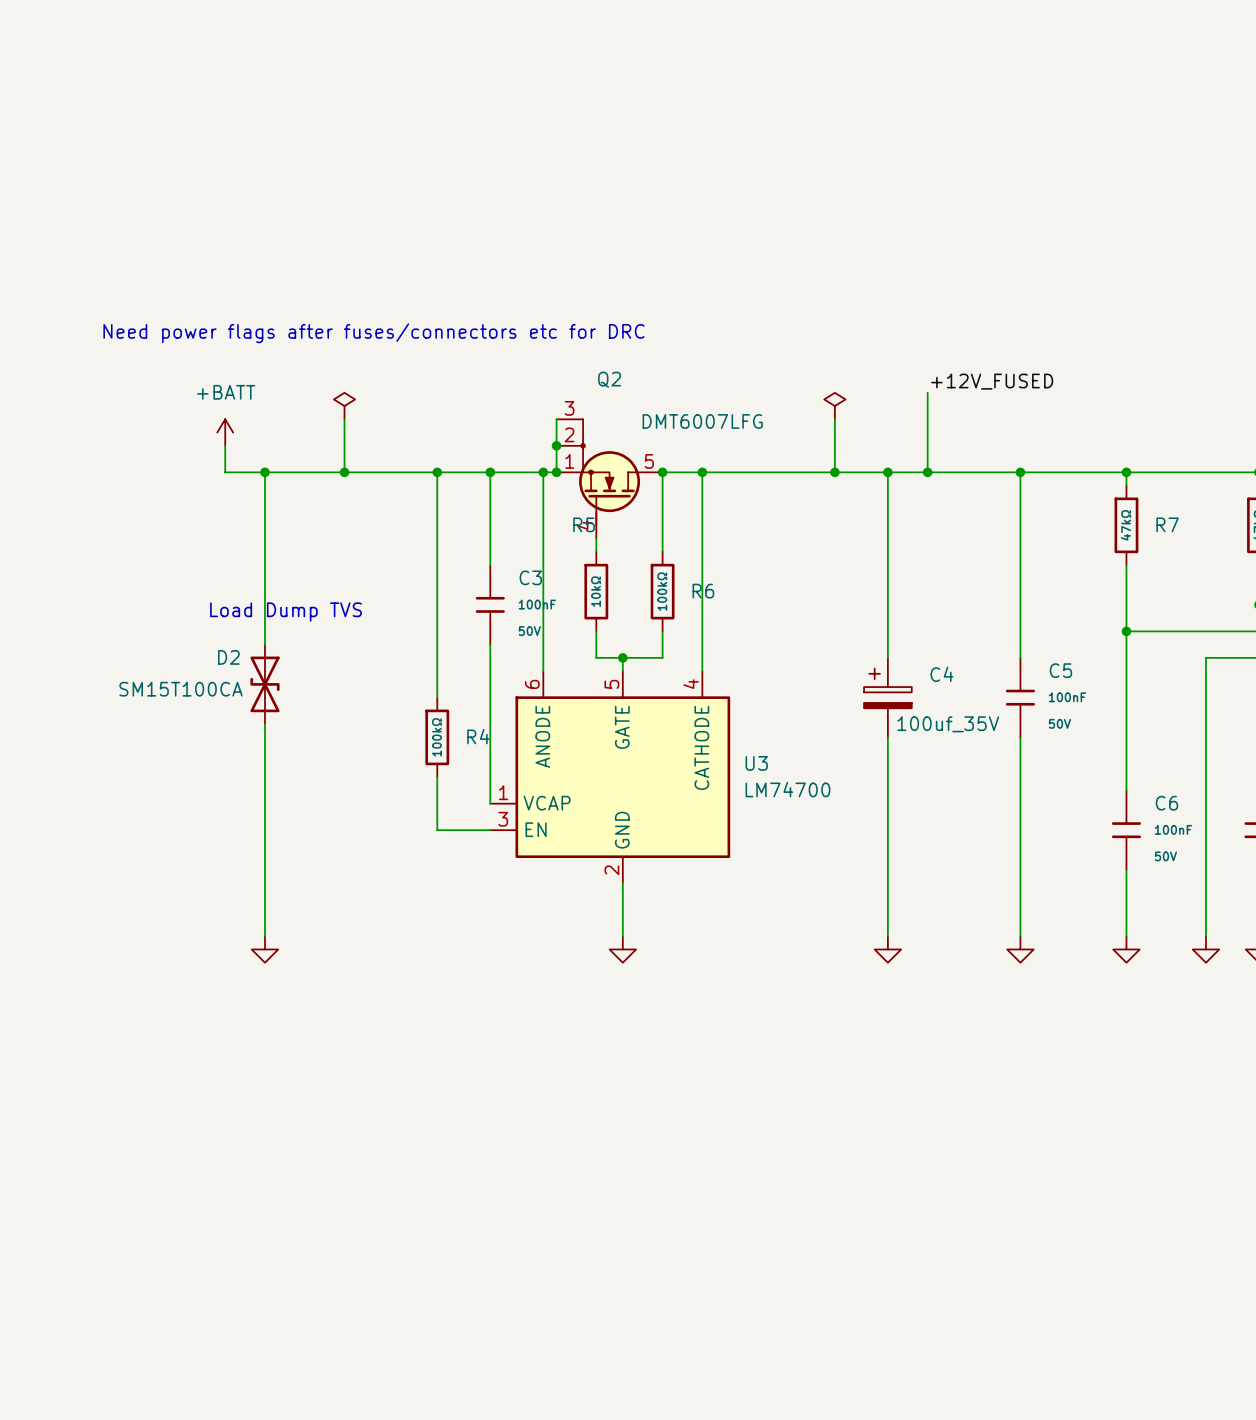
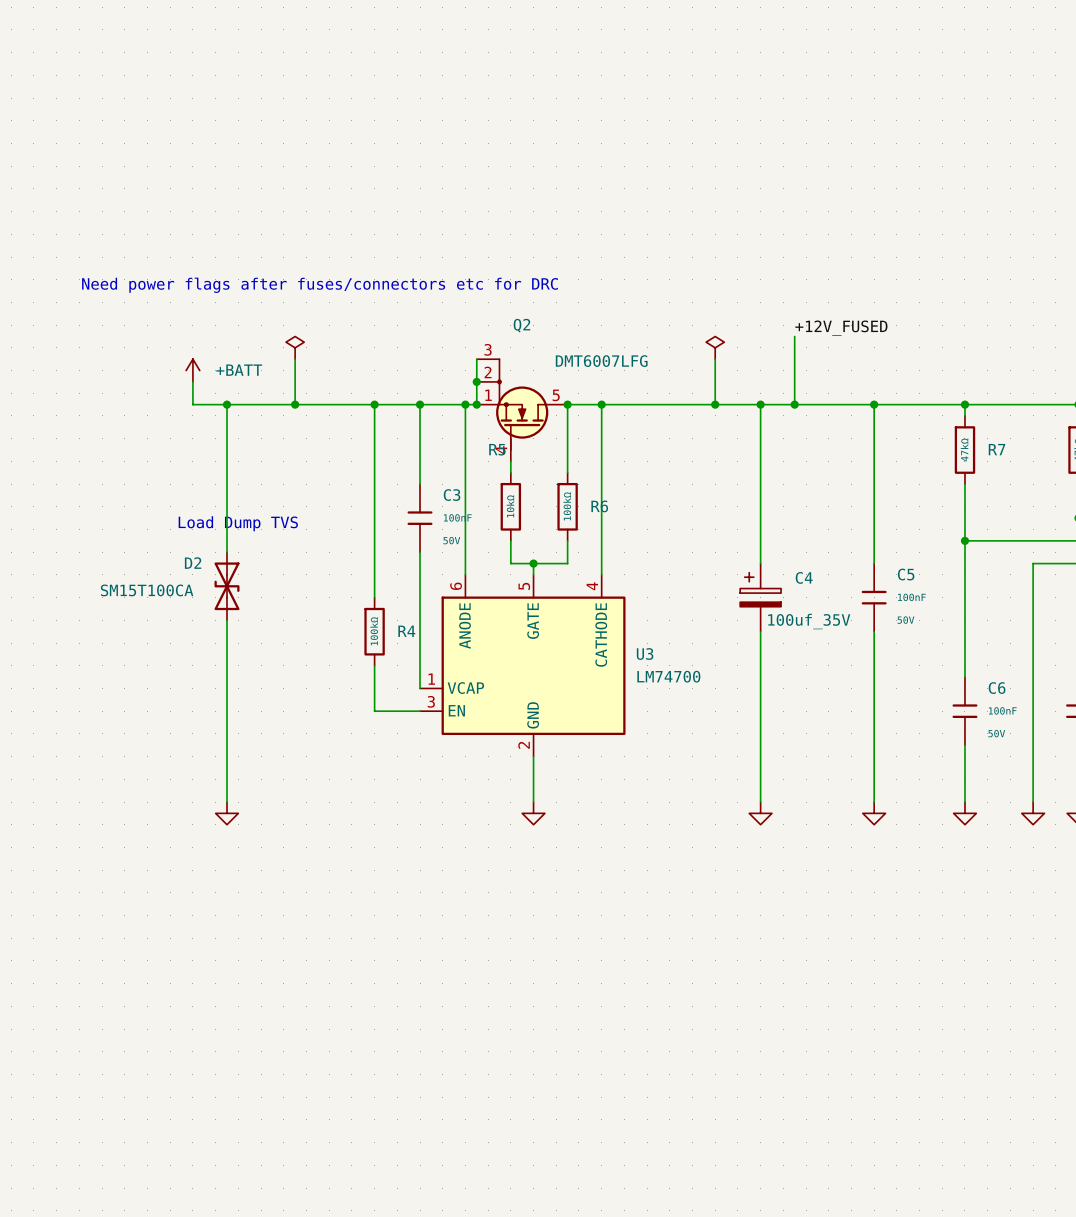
power symbol text position: +BATT (226, 392) -> +BATT (239, 370)

